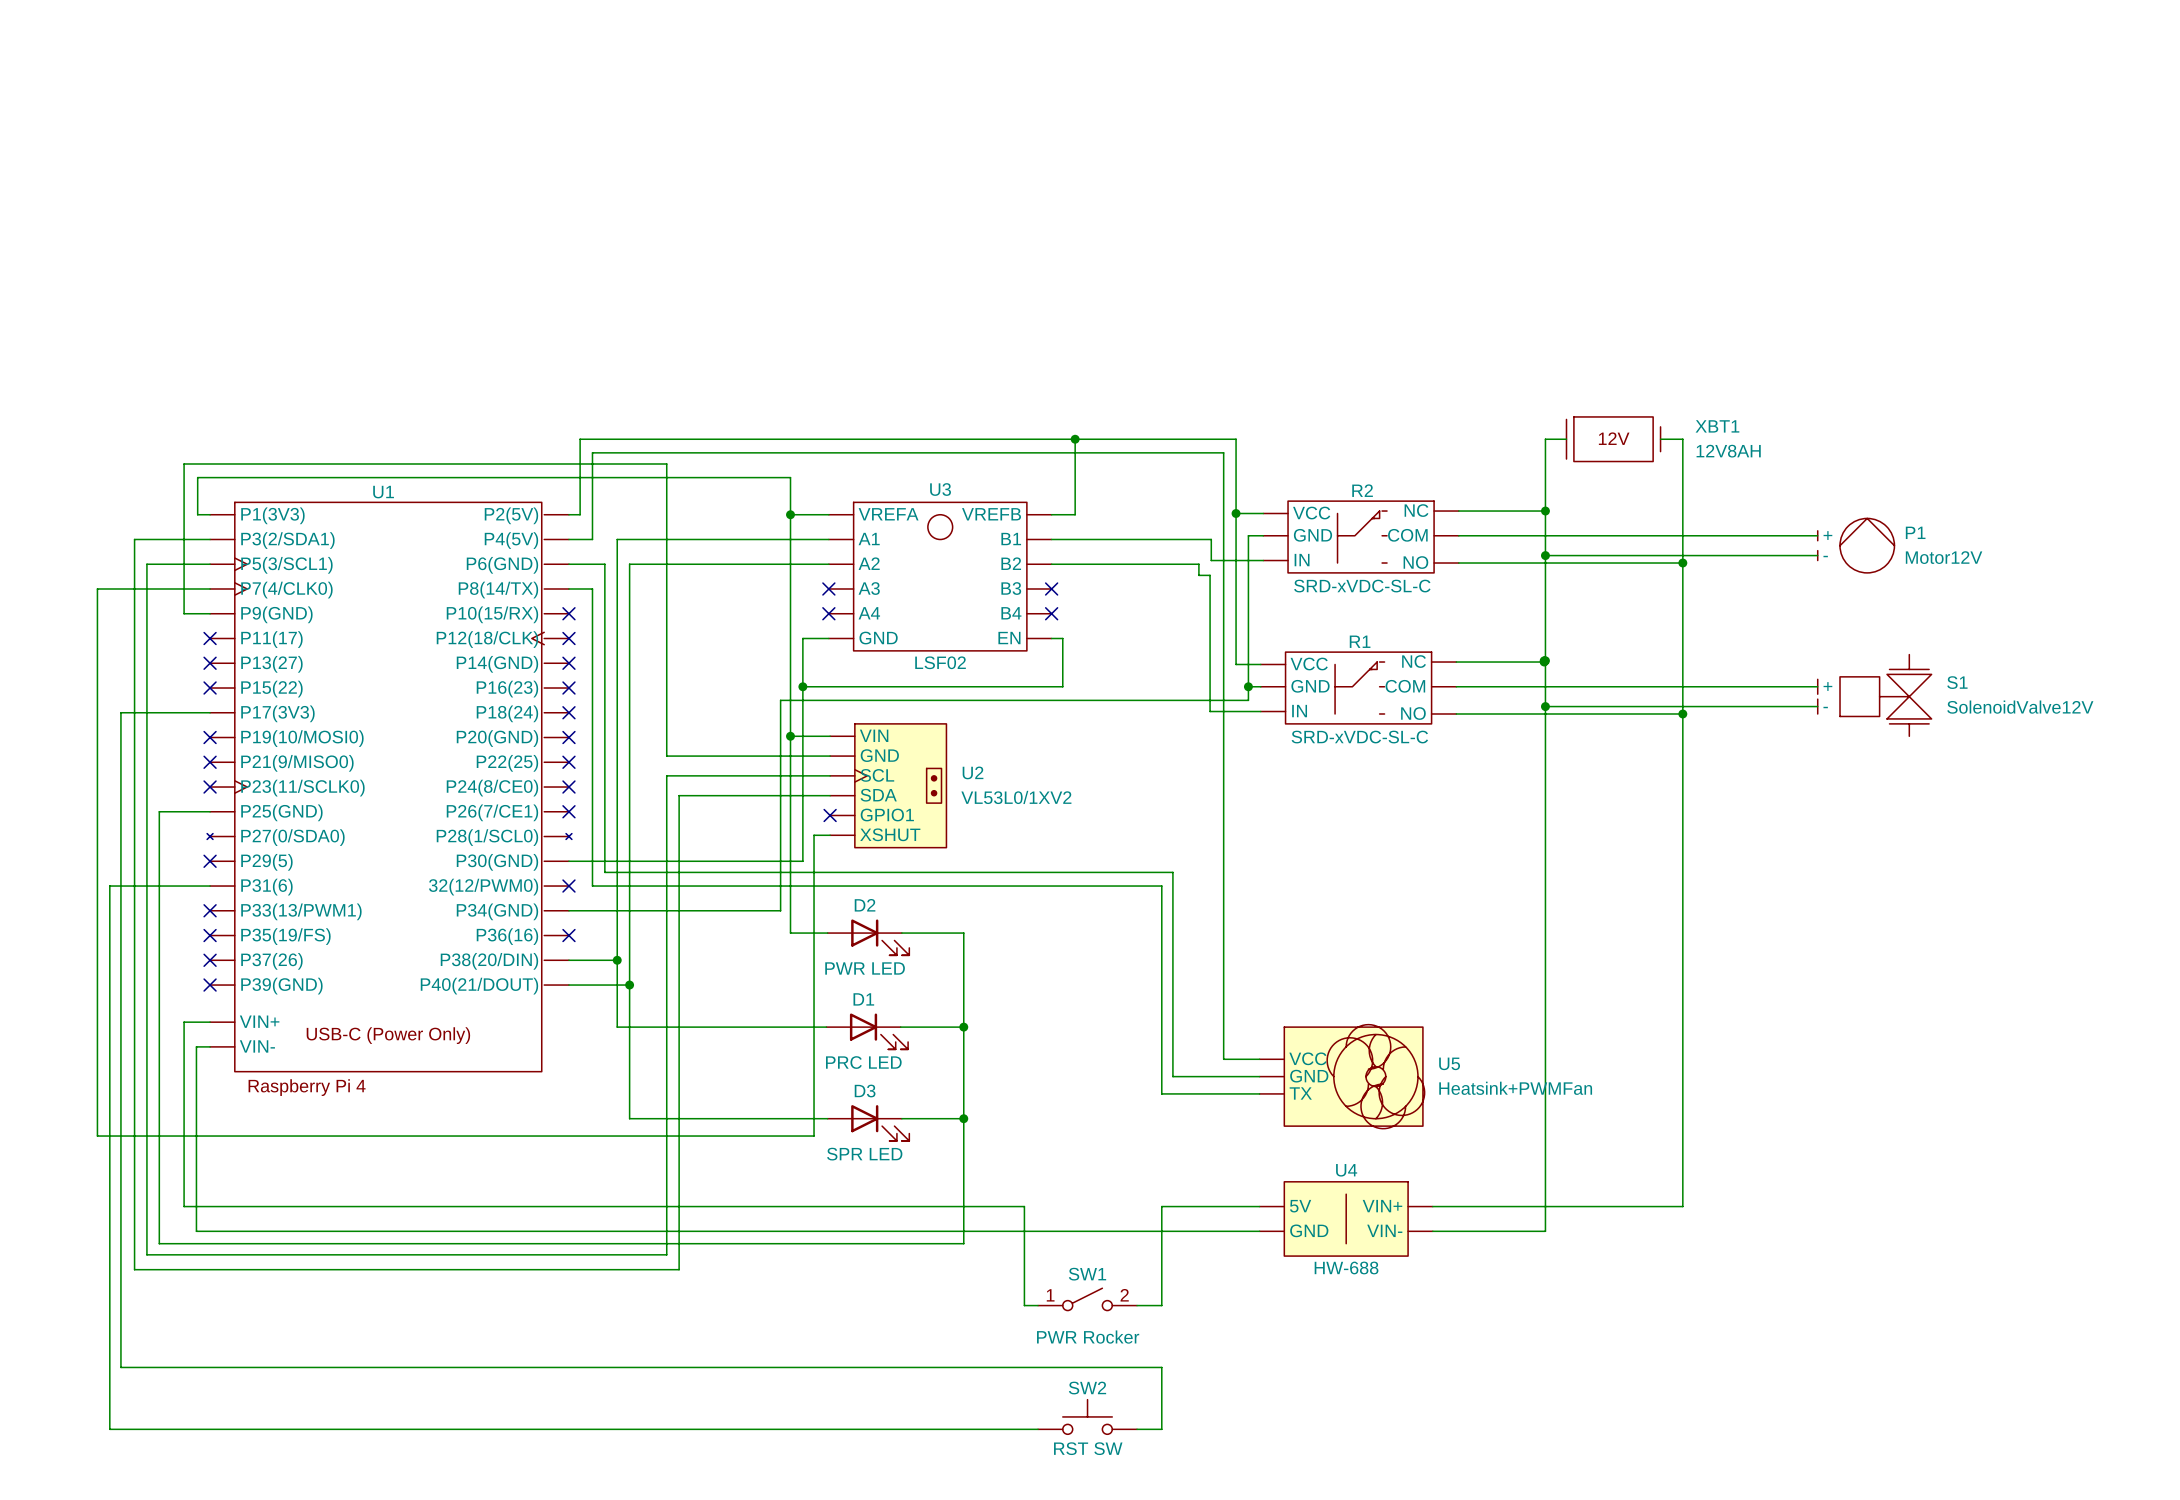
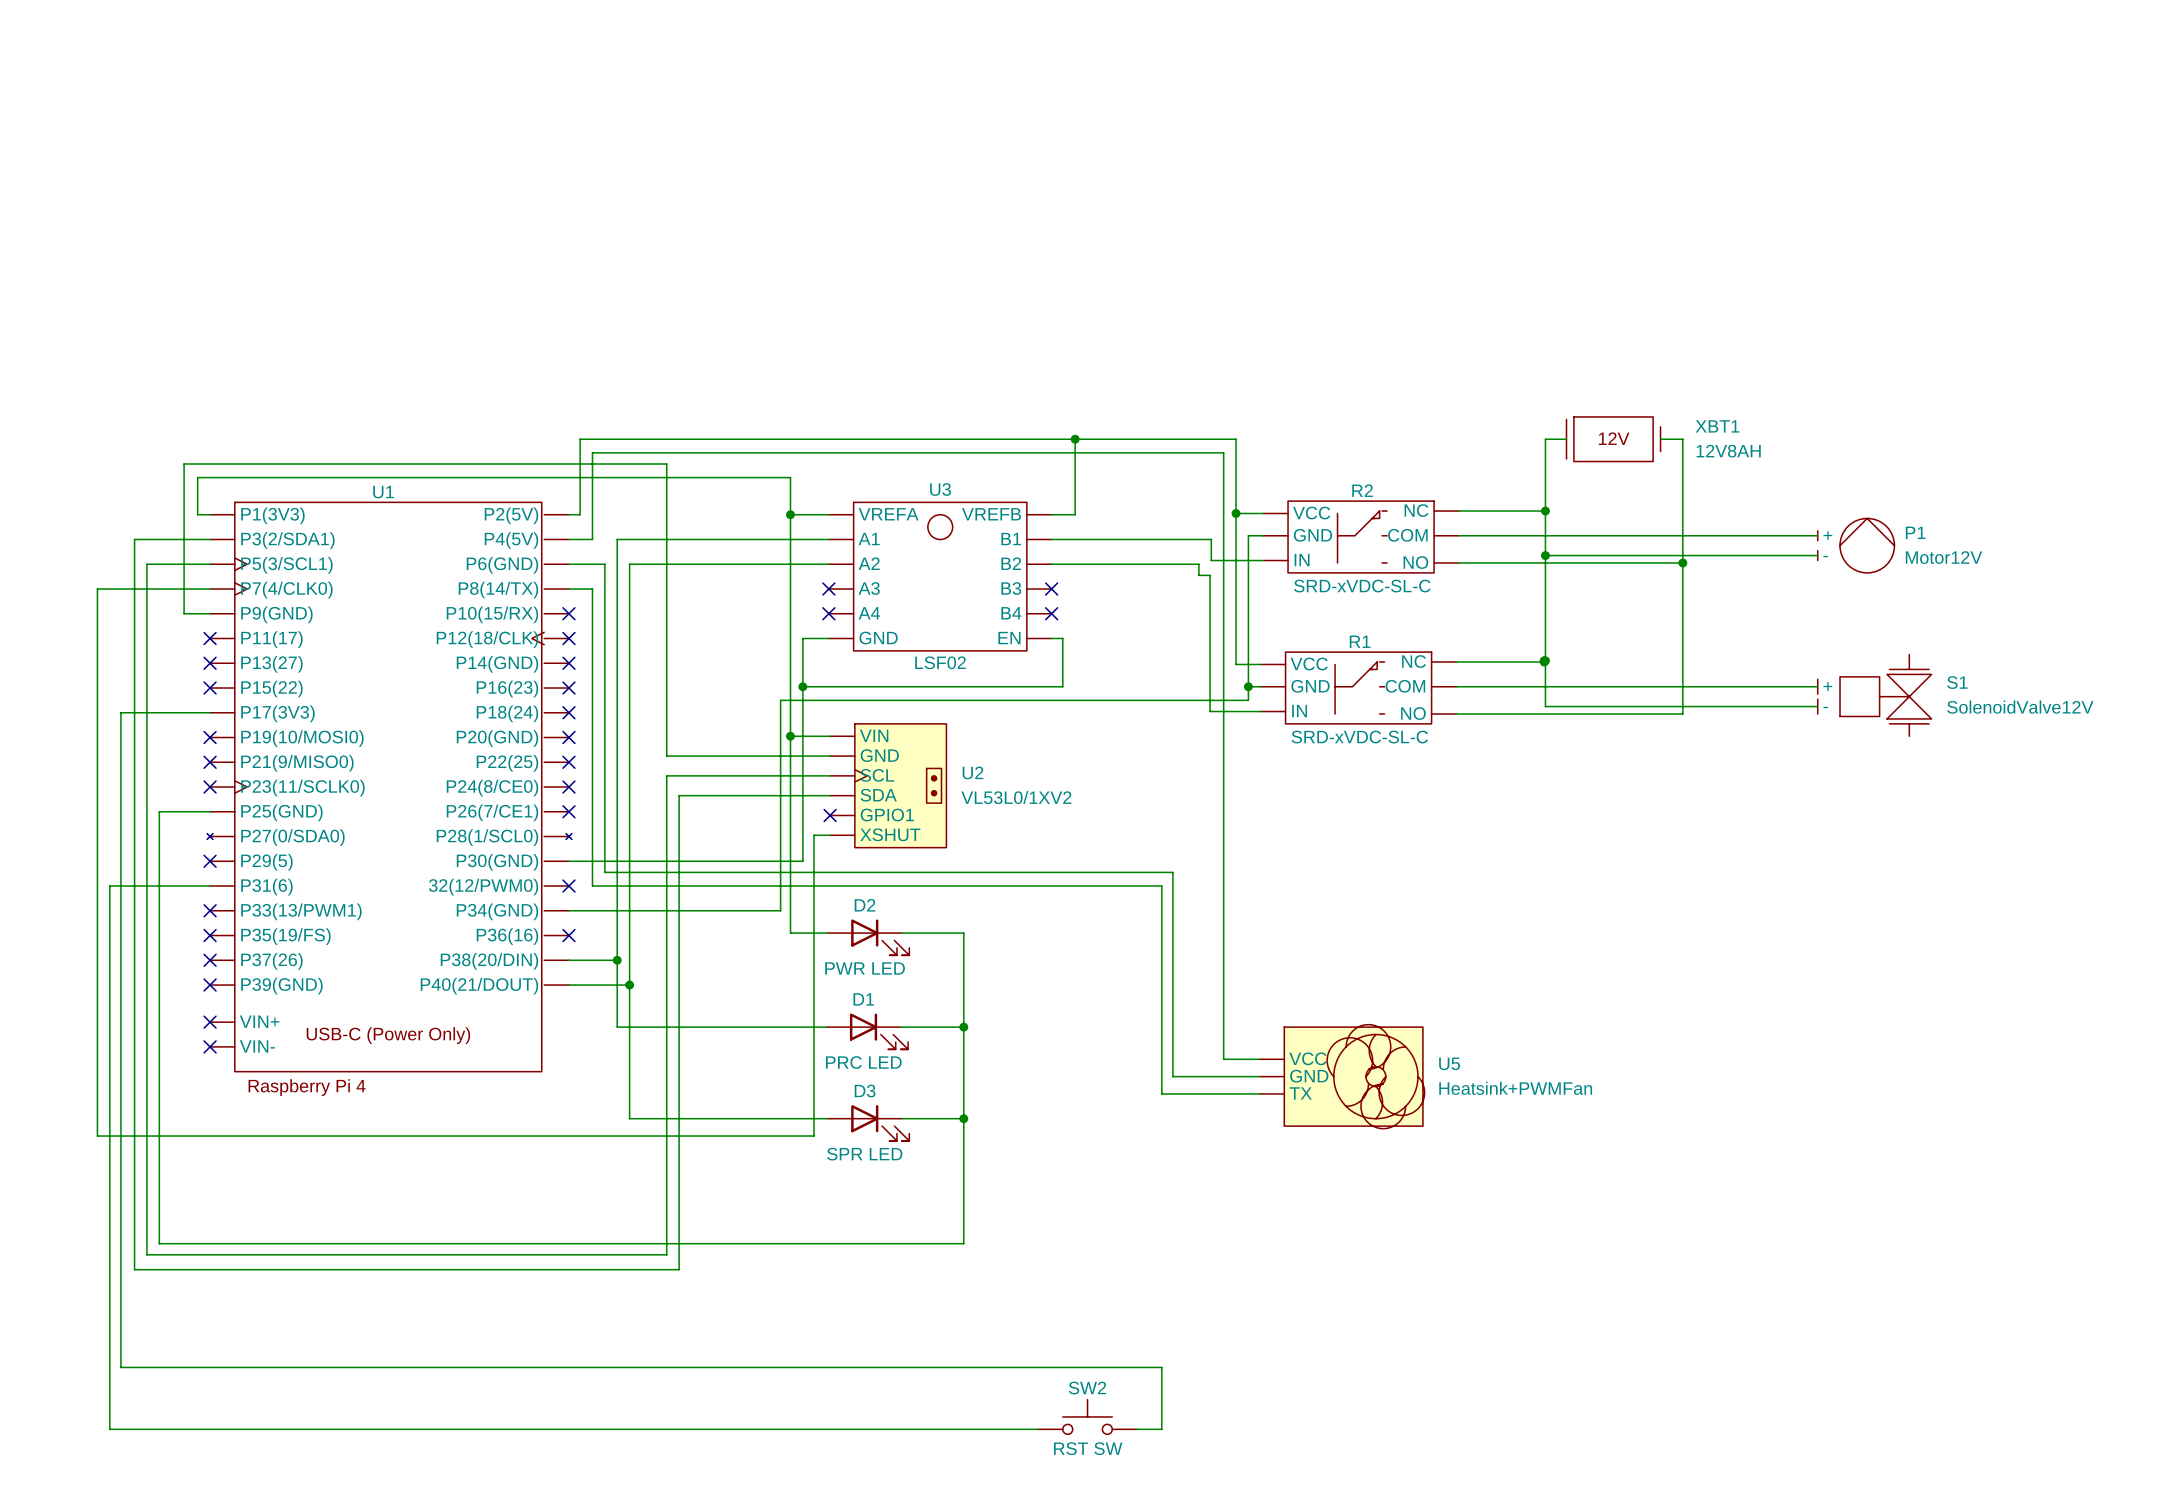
wire: (1545, 706) (1545, 1231) (1432, 1231) -> none
junction: (1545, 706) -> none
wire: (1682, 713) (1682, 1206) (1432, 1206) -> none
junction: (1682, 713) -> none
wire: (210, 1022) (184, 1022) (184, 1206) (1024, 1206) (1024, 1305) (1038, 1305) -> none
no-connect mark: none -> (210, 1022)
wire: (210, 1046) (196, 1046) (196, 1231) (1259, 1231) -> none
no-connect mark: none -> (210, 1046)
wire: (1259, 1206) (1161, 1206) (1161, 1305) (1137, 1305) -> none
U4: HW-688 (1346, 1218) -> none
SW1: PWR Rocker (1087, 1299) -> none

